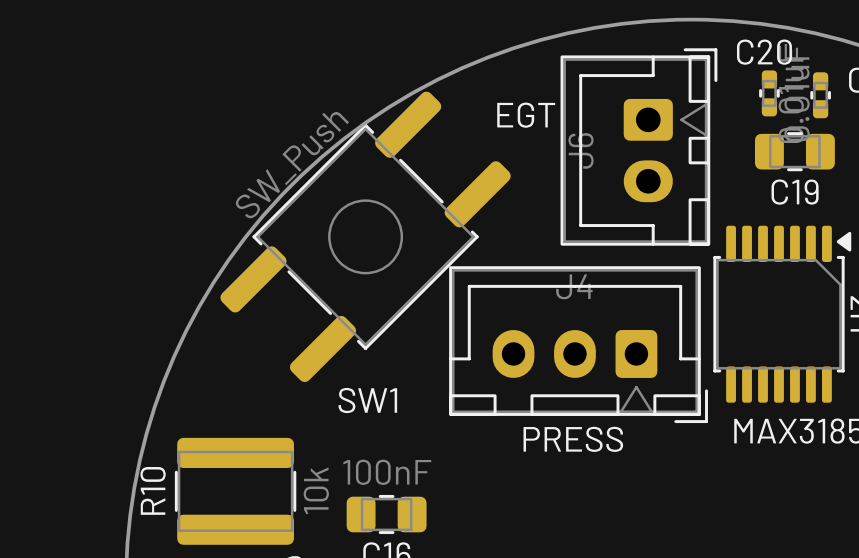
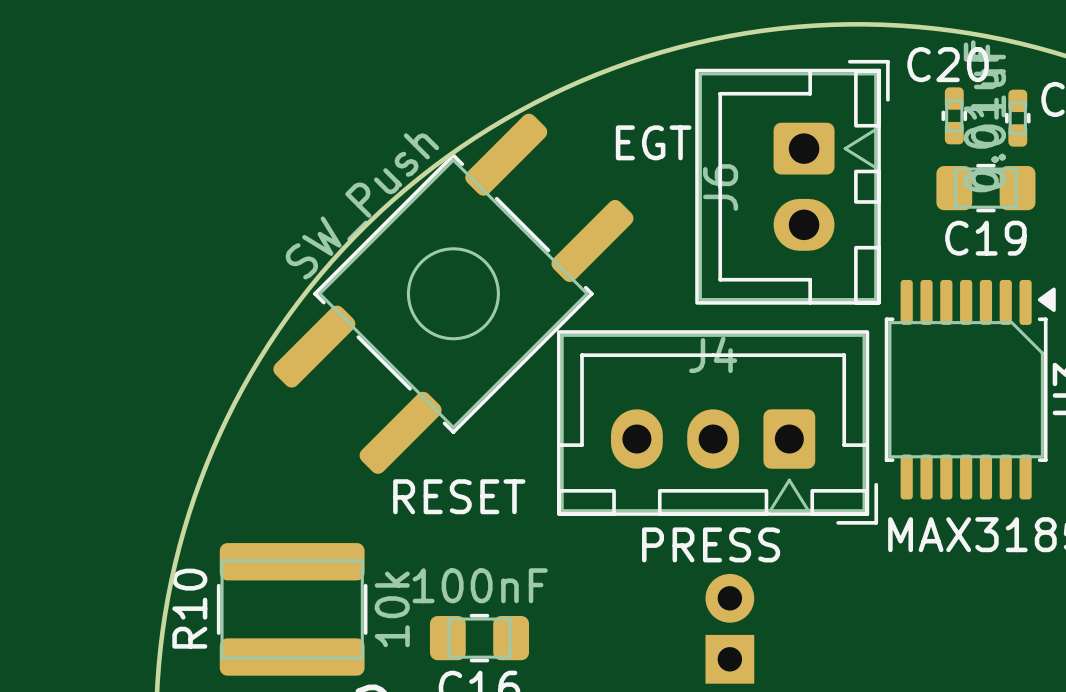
SW1 name: SW1 (367, 400) -> RESET (459, 496)
part: none -> (729, 628)

